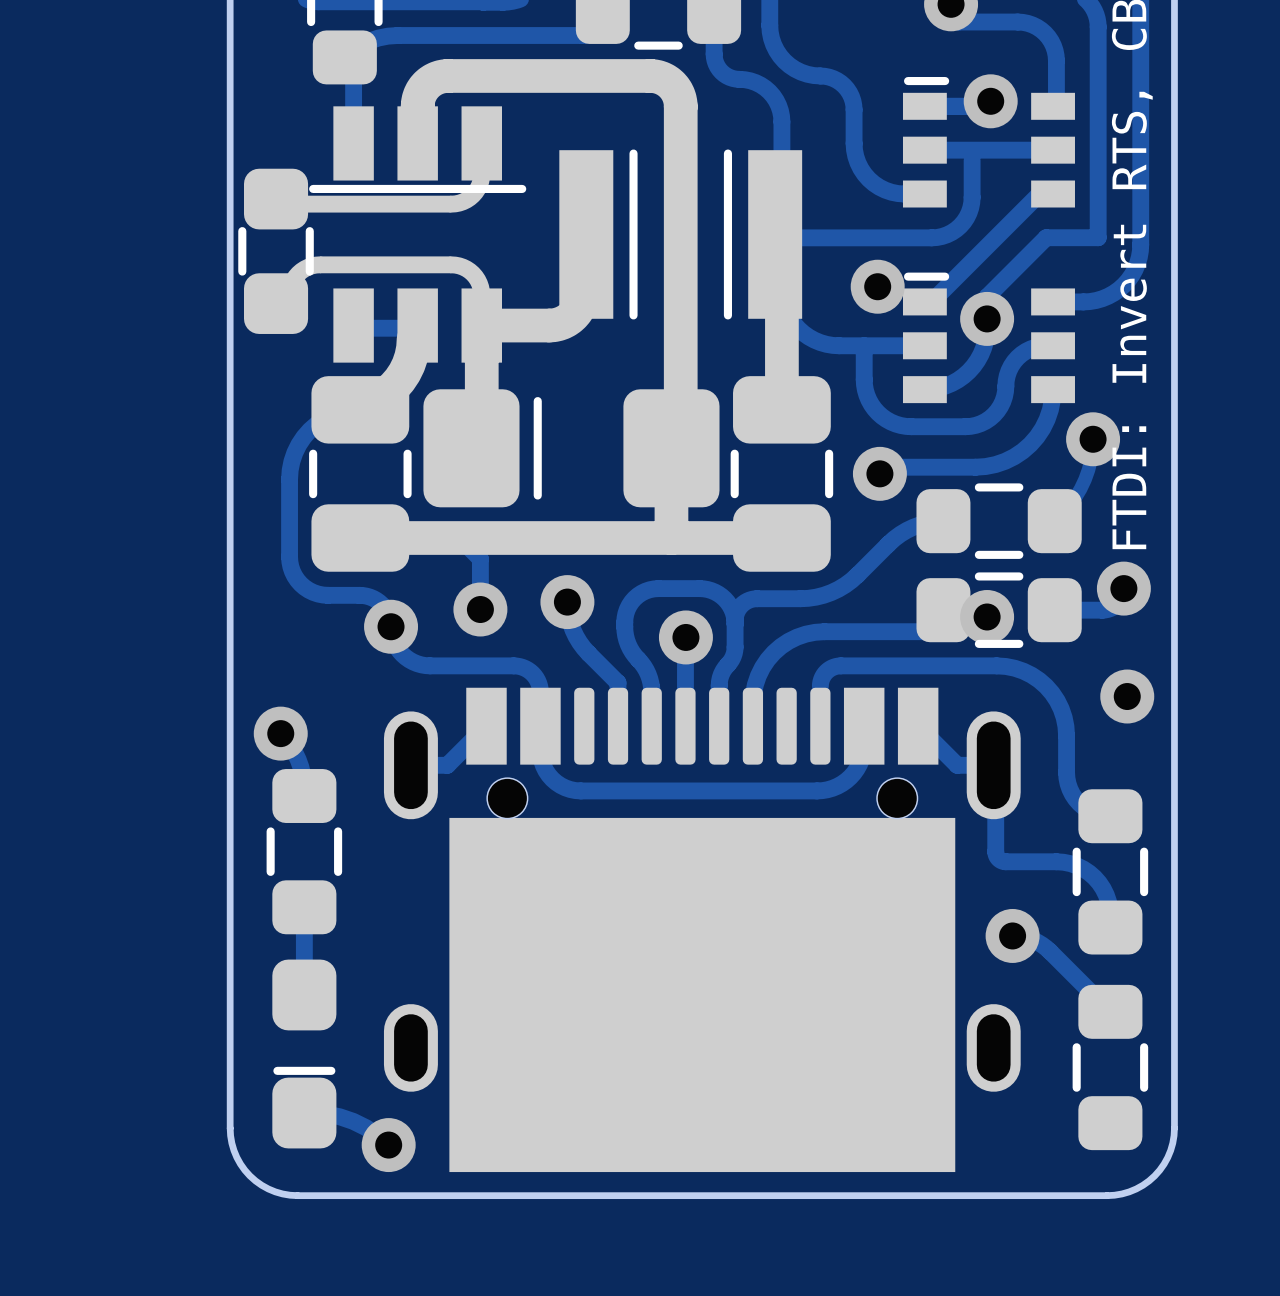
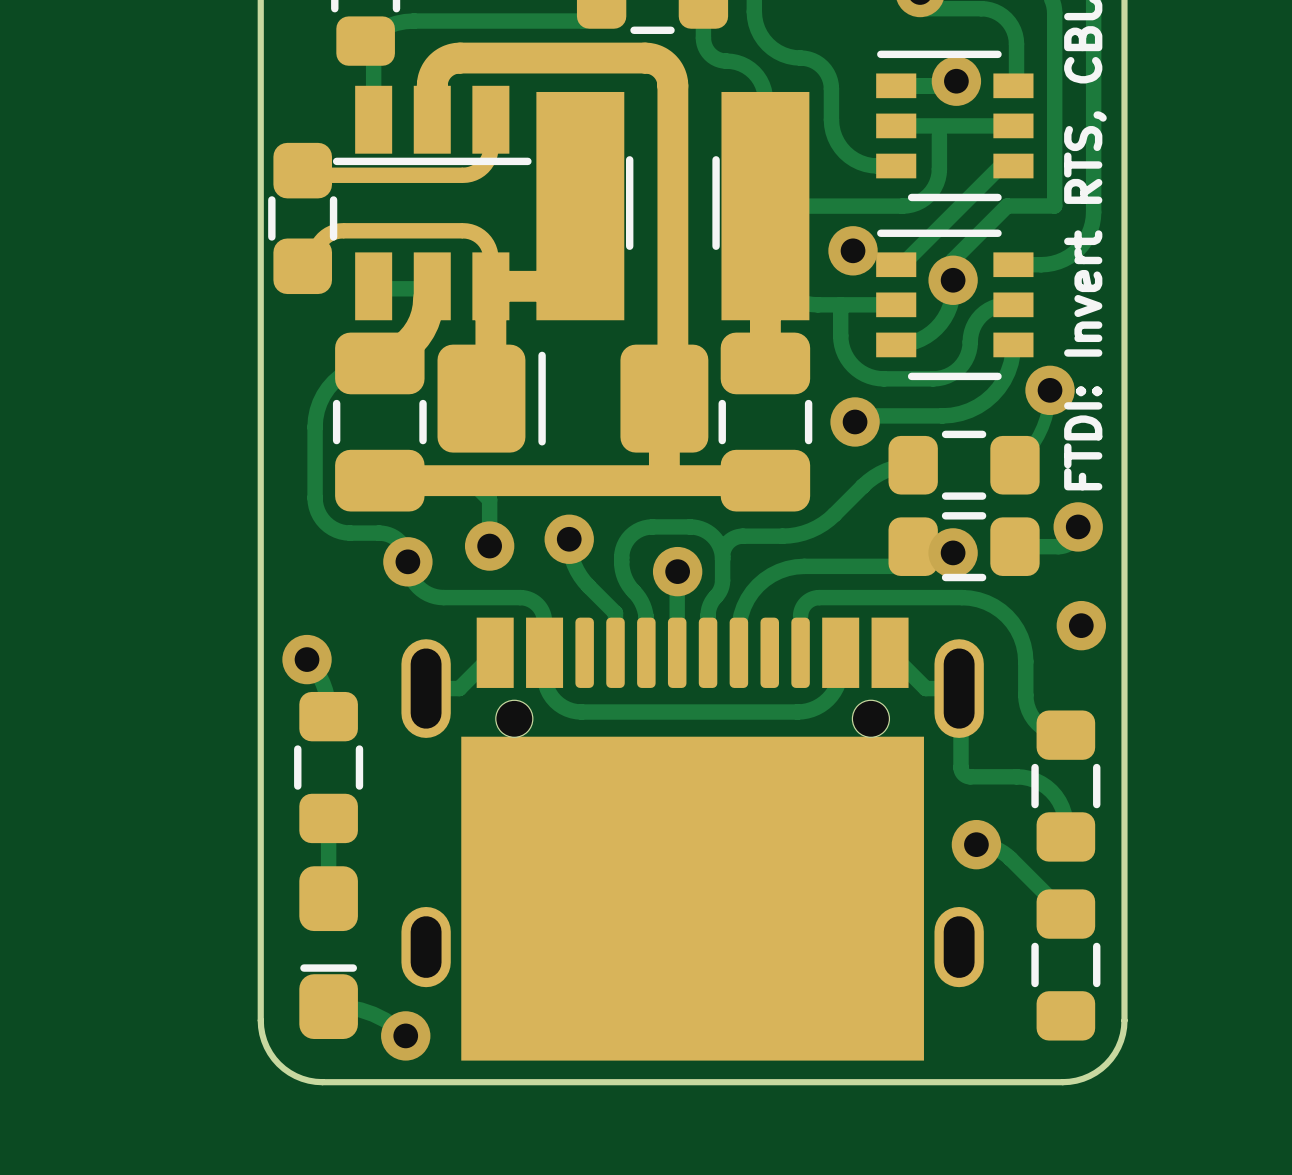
part footprint: [244, 59, 831, 572] -> [273, 42, 811, 512]
part footprint: [902, 76, 1075, 208] -> [876, 50, 1034, 202]
drawing shape: [629, 149, 733, 320] -> [625, 156, 720, 250]
part footprint: [902, 272, 1075, 404] -> [876, 229, 1034, 381]

